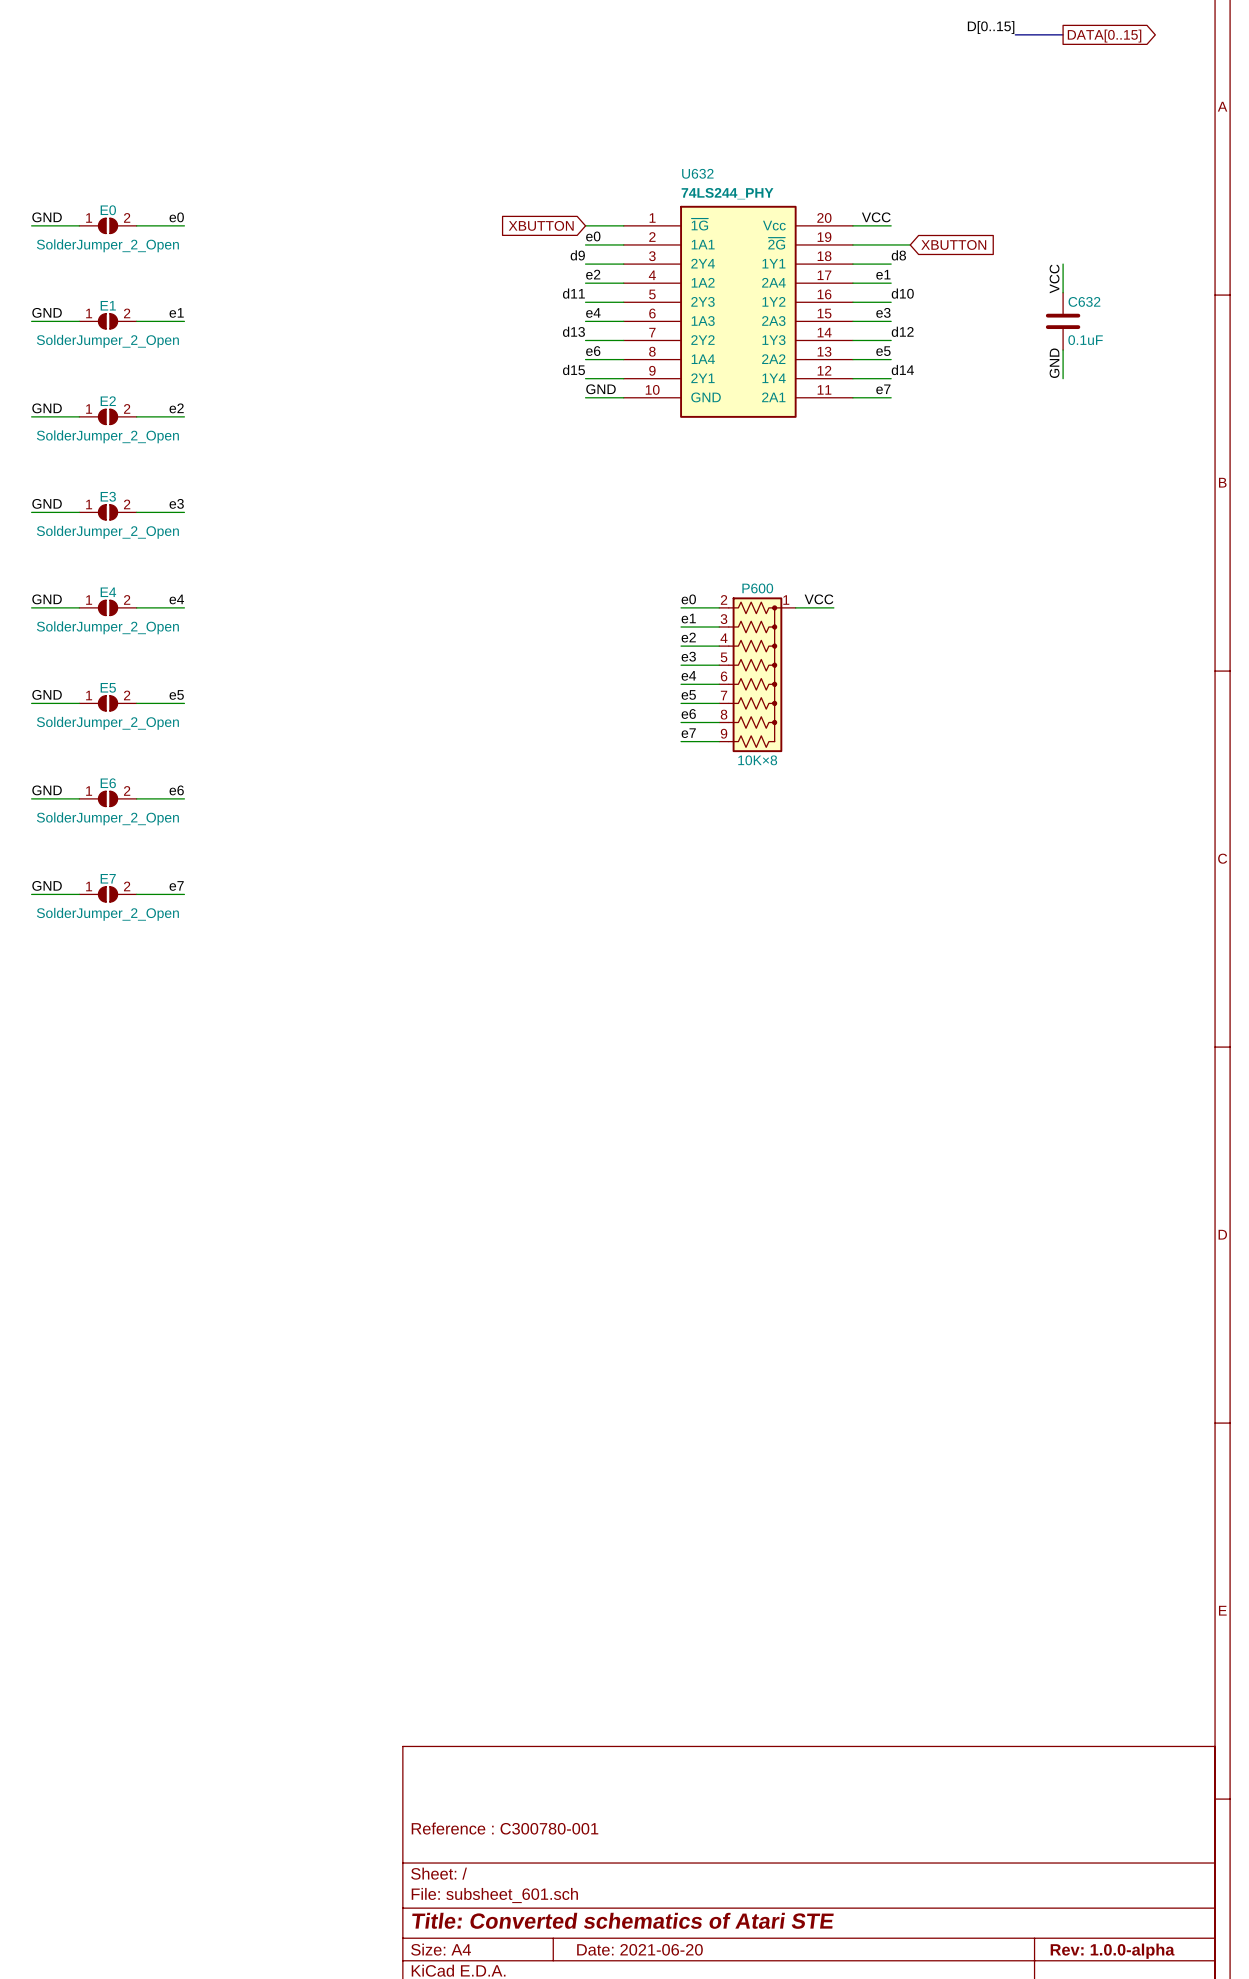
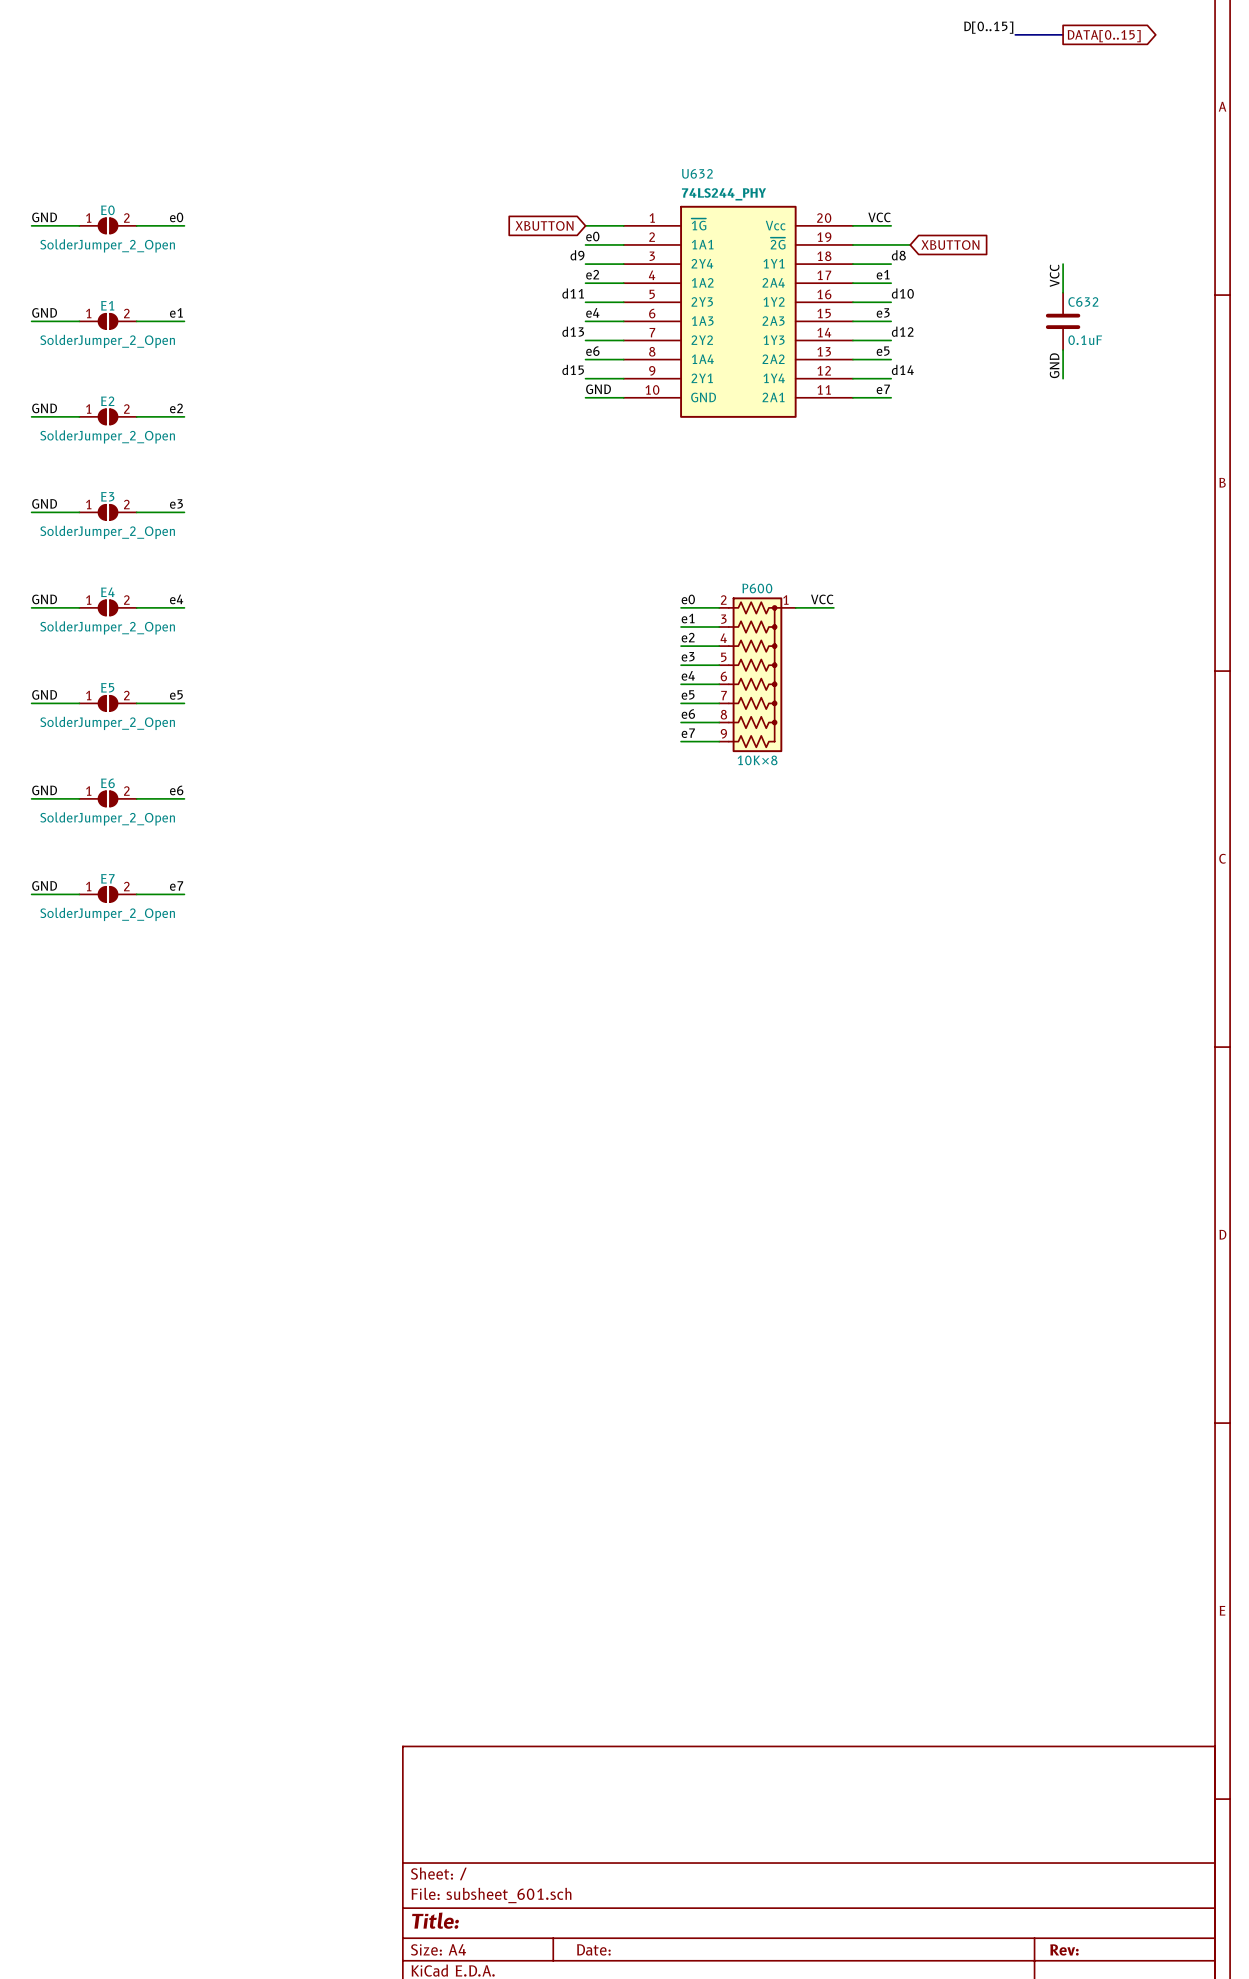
title block: Reference : C300780-001 (505, 1828) -> none
title block: Title: Converted schematics of Atari STE (622, 1920) -> Title: (435, 1920)
title block: Date: 2021-06-20 (639, 1949) -> Date: (593, 1949)
title block: Rev: 1.0.0-alpha (1112, 1951) -> Rev: (1064, 1949)

